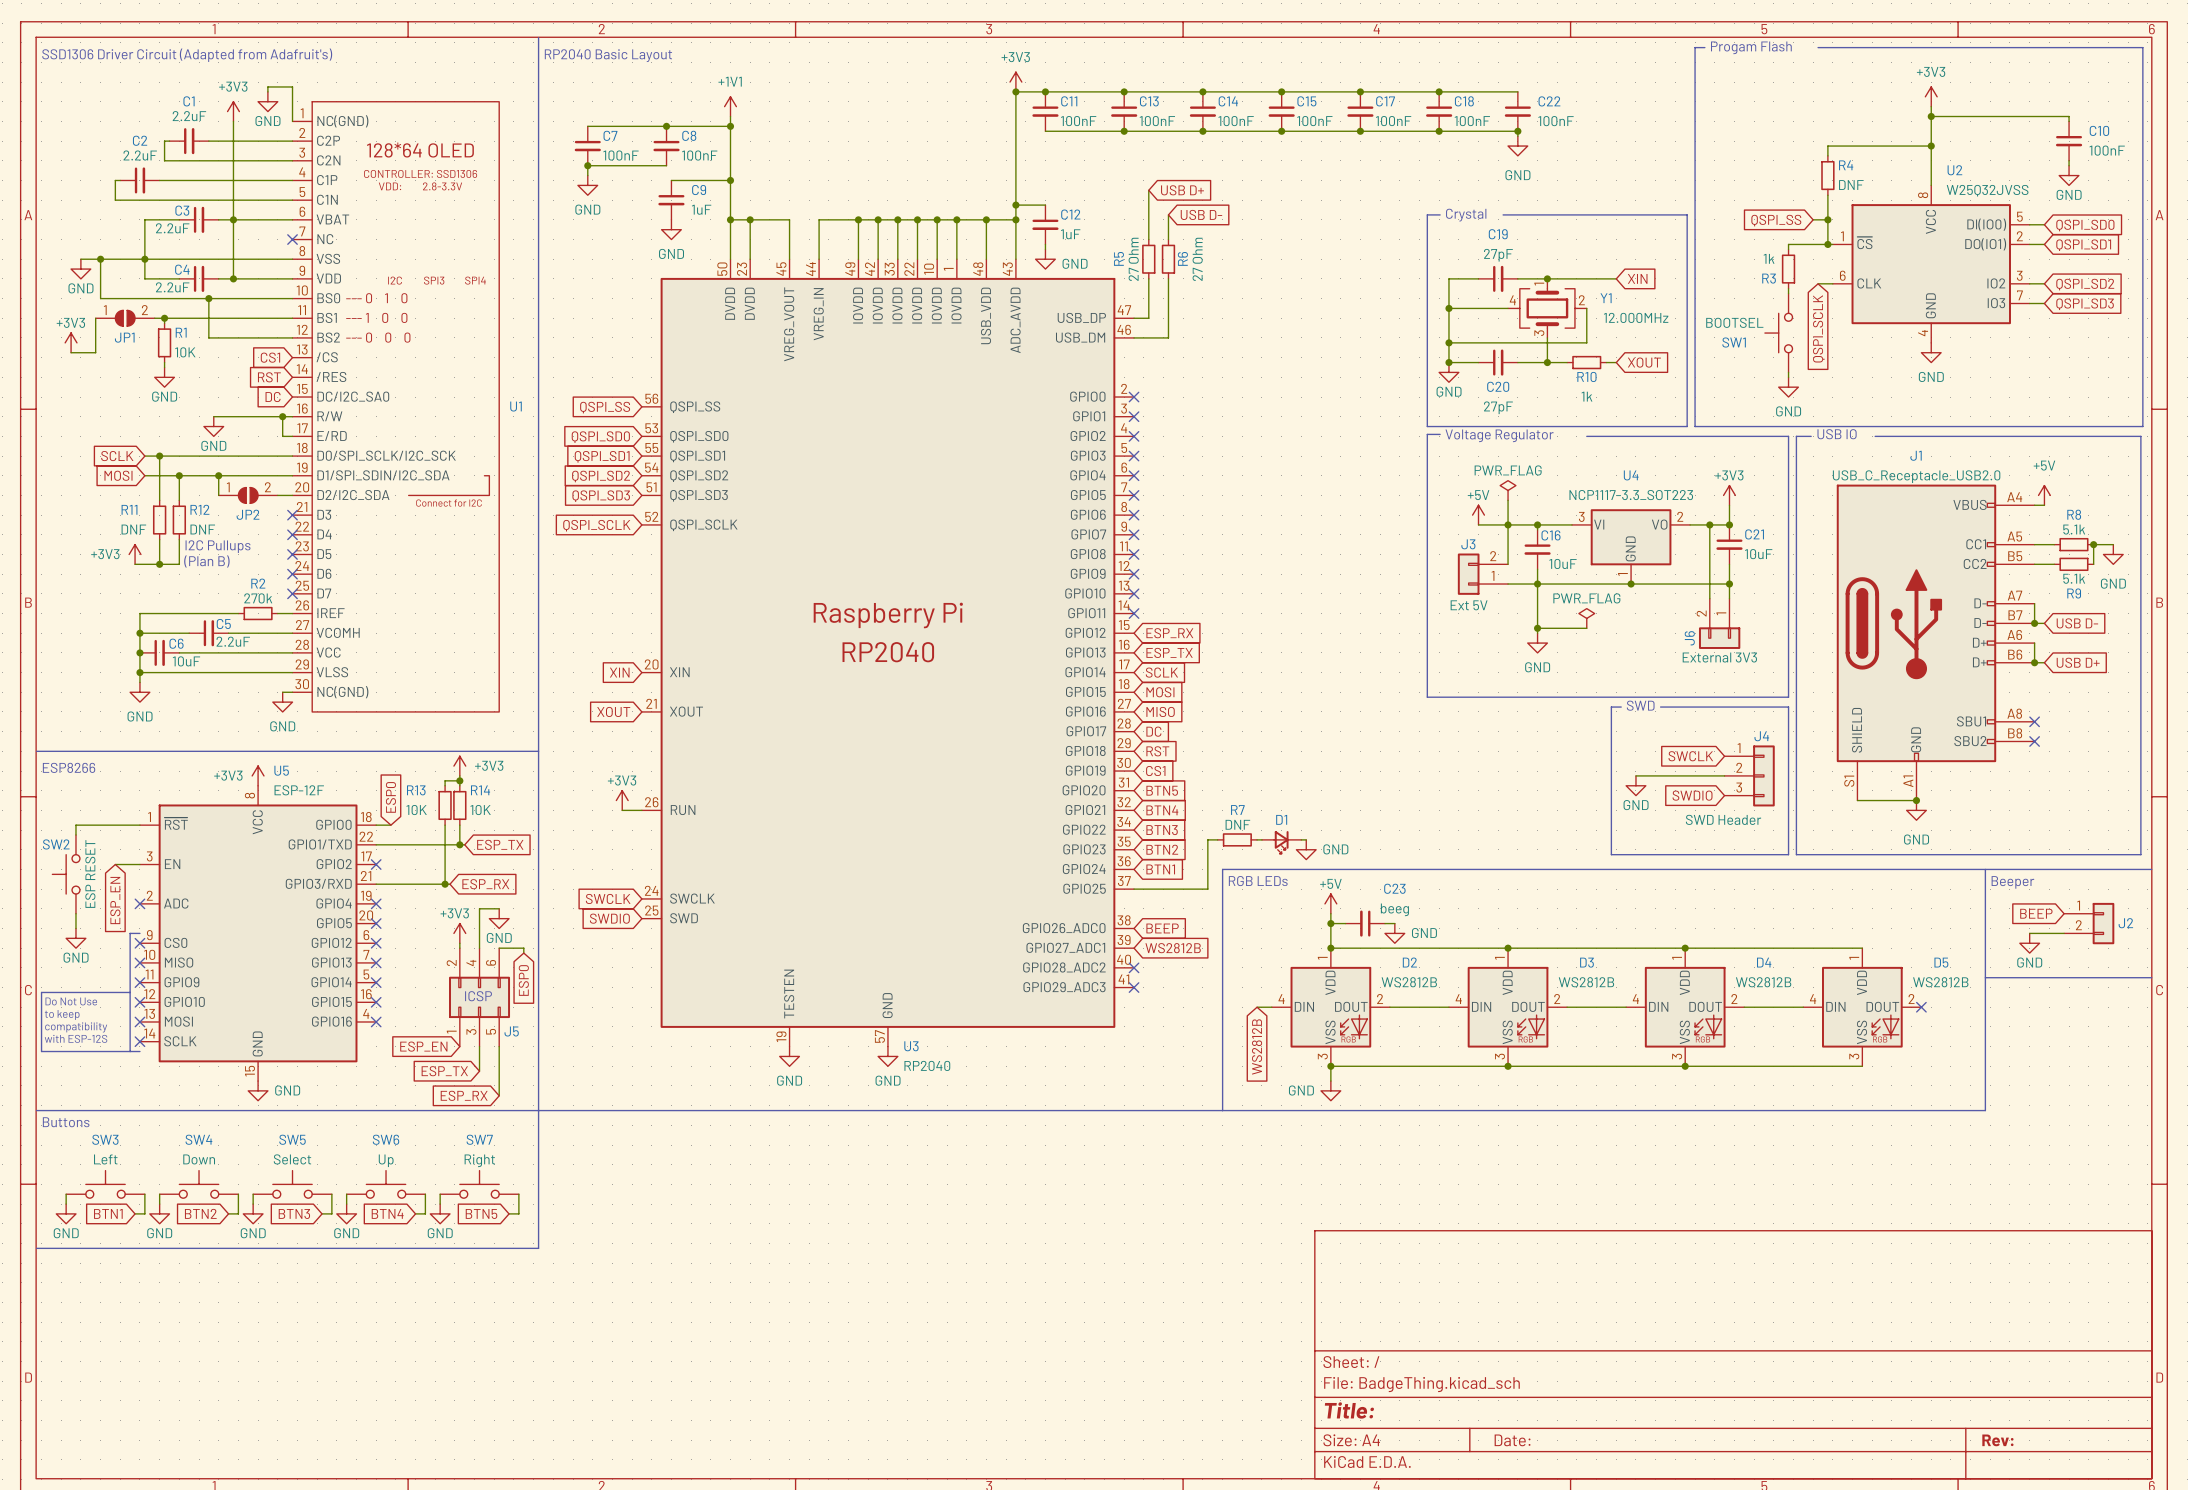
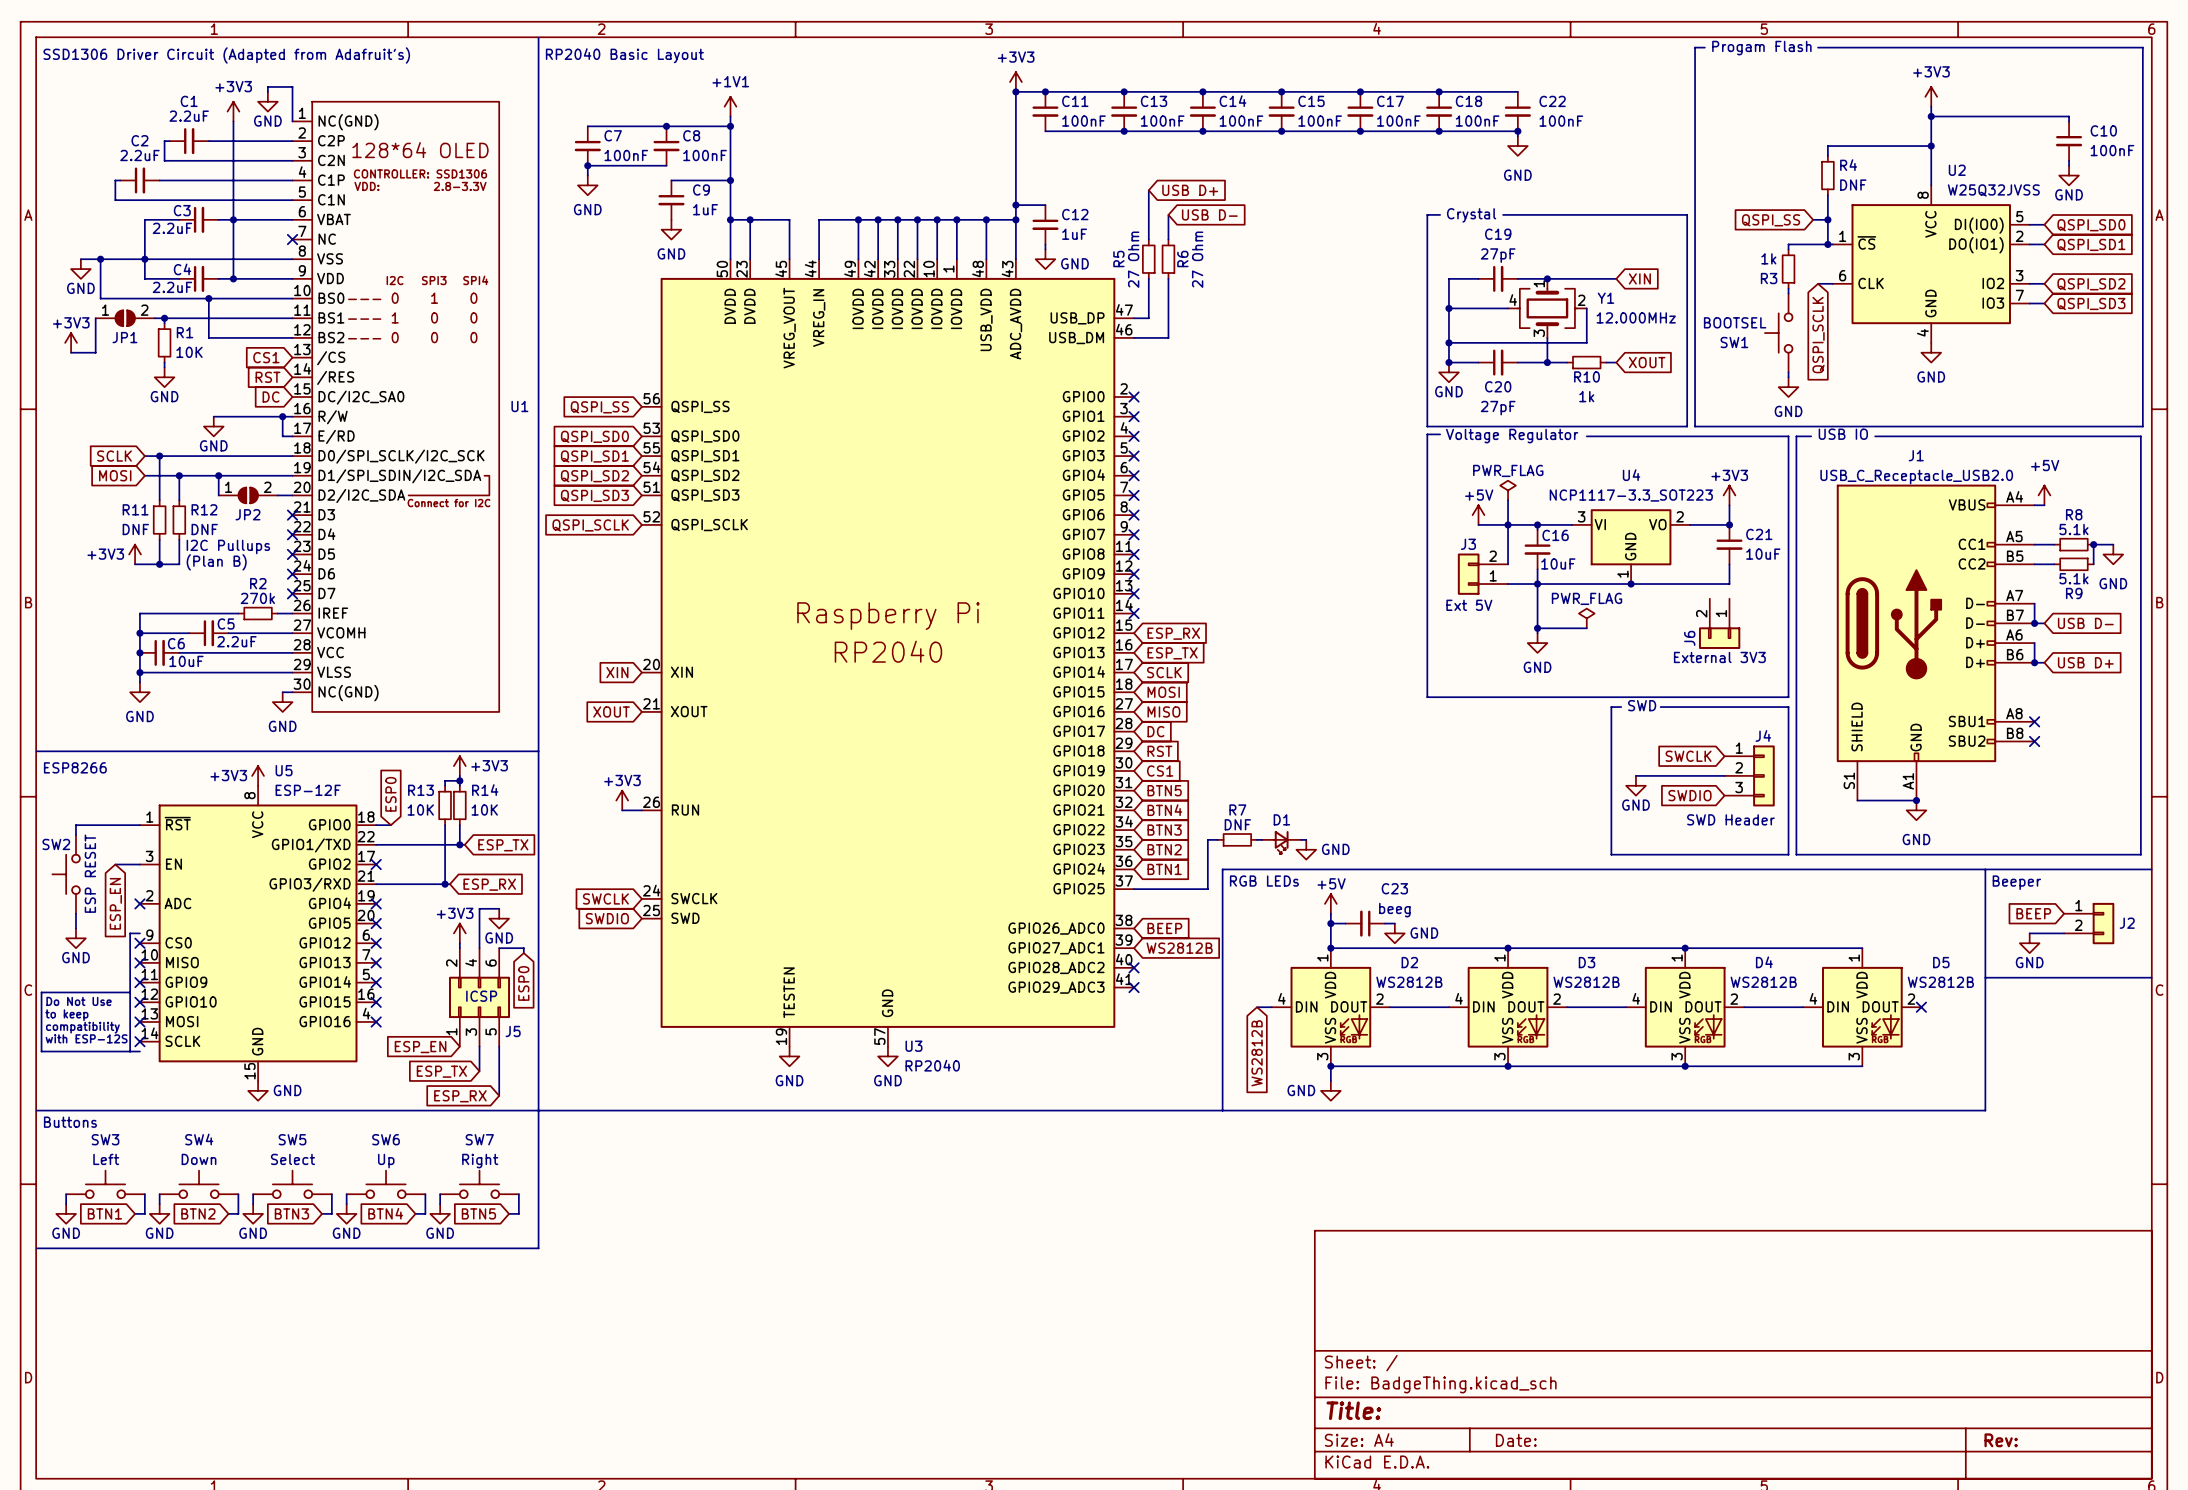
wire: (1709, 524) (1709, 598) -> none
junction: (1709, 524) -> none
wire: (1729, 584) (1729, 598) -> none
junction: (1729, 584) -> none

